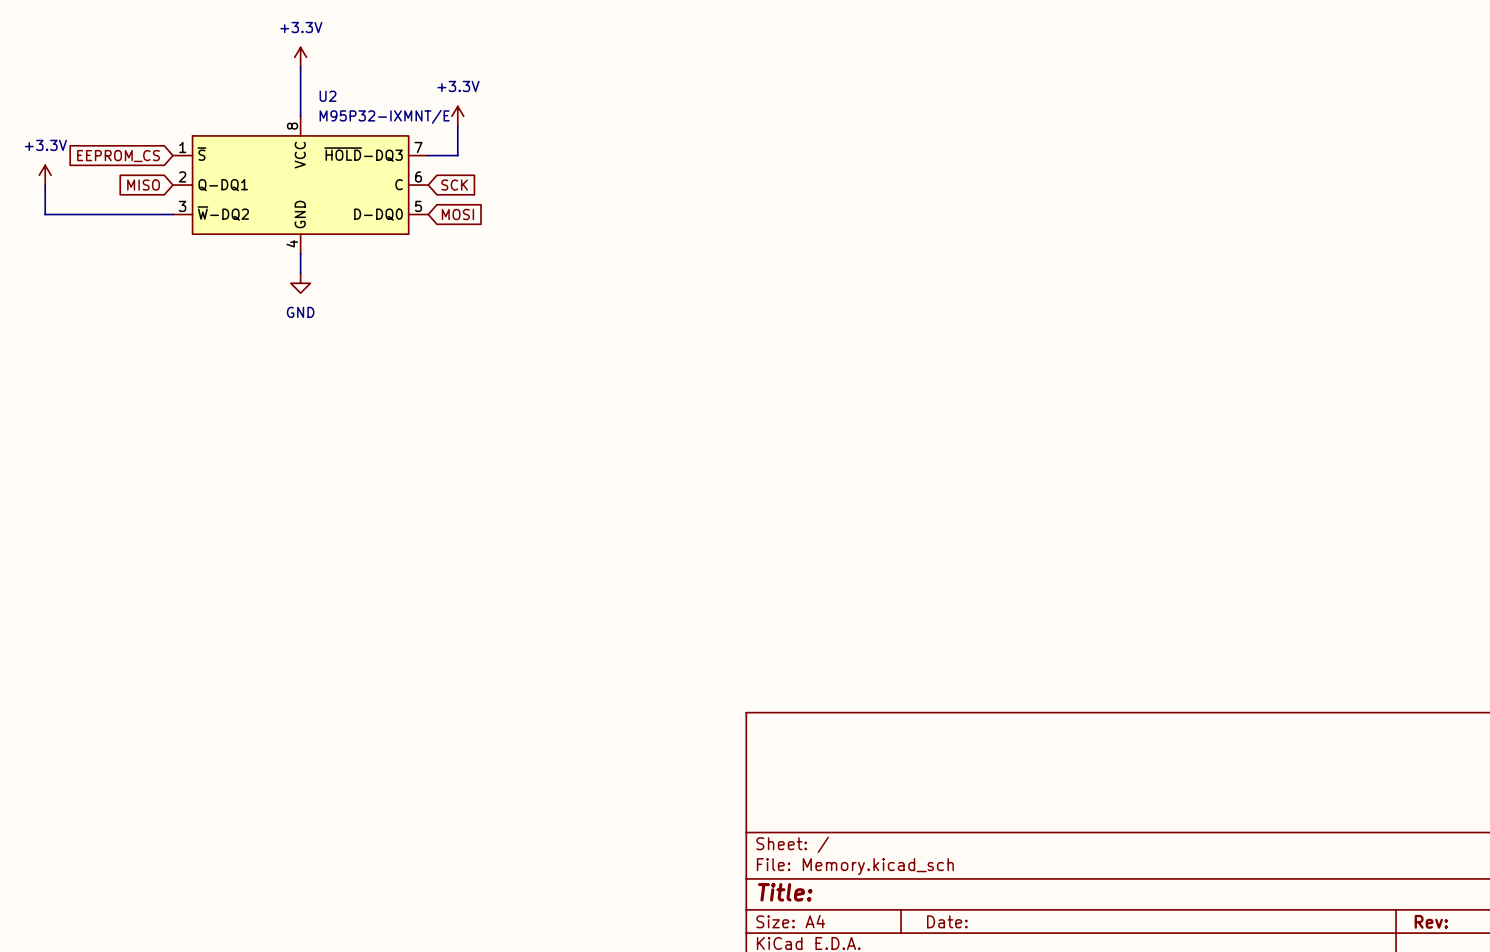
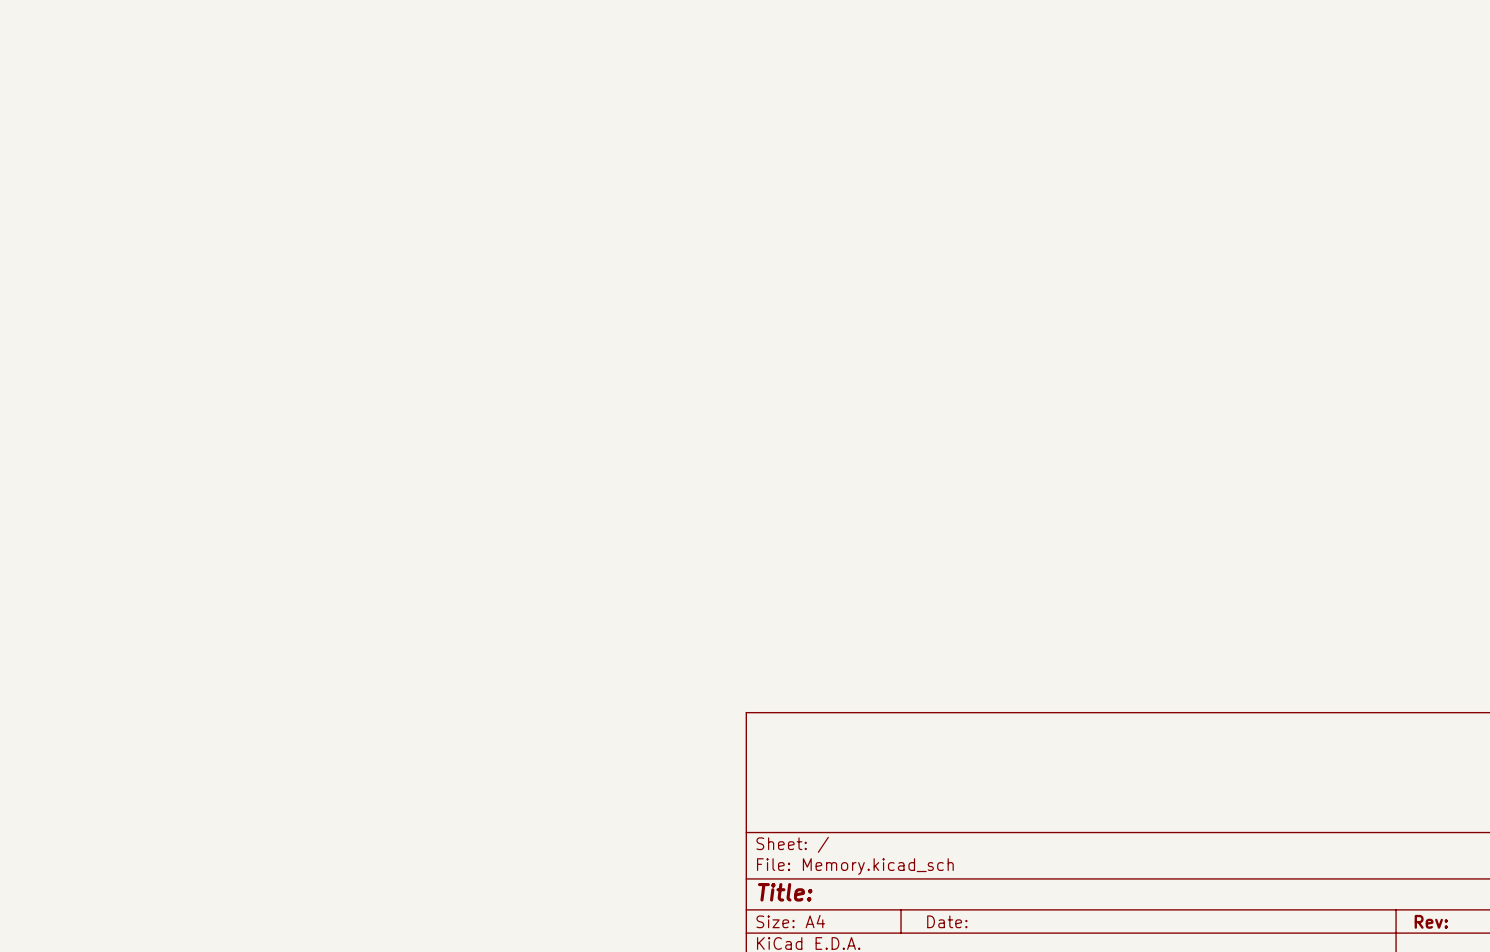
power symbol: +3.3V (300, 57) -> none
wire: (300, 67) (300, 116) -> none
power symbol: +3.3V (457, 116) -> none
wire: (457, 126) (457, 155) (428, 155) -> none
global label: EEPROM_CS (118, 156) -> none
power symbol: +3.3V (45, 175) -> none
wire: (45, 185) (45, 214) (172, 214) -> none
global label: MISO (143, 185) -> none
U2: M95P32-IXMNT/E (300, 185) -> none
global label: SCK (454, 185) -> none
global label: MOSI (457, 214) -> none
wire: (300, 253) (300, 273) -> none
power symbol: GND (300, 283) -> none

